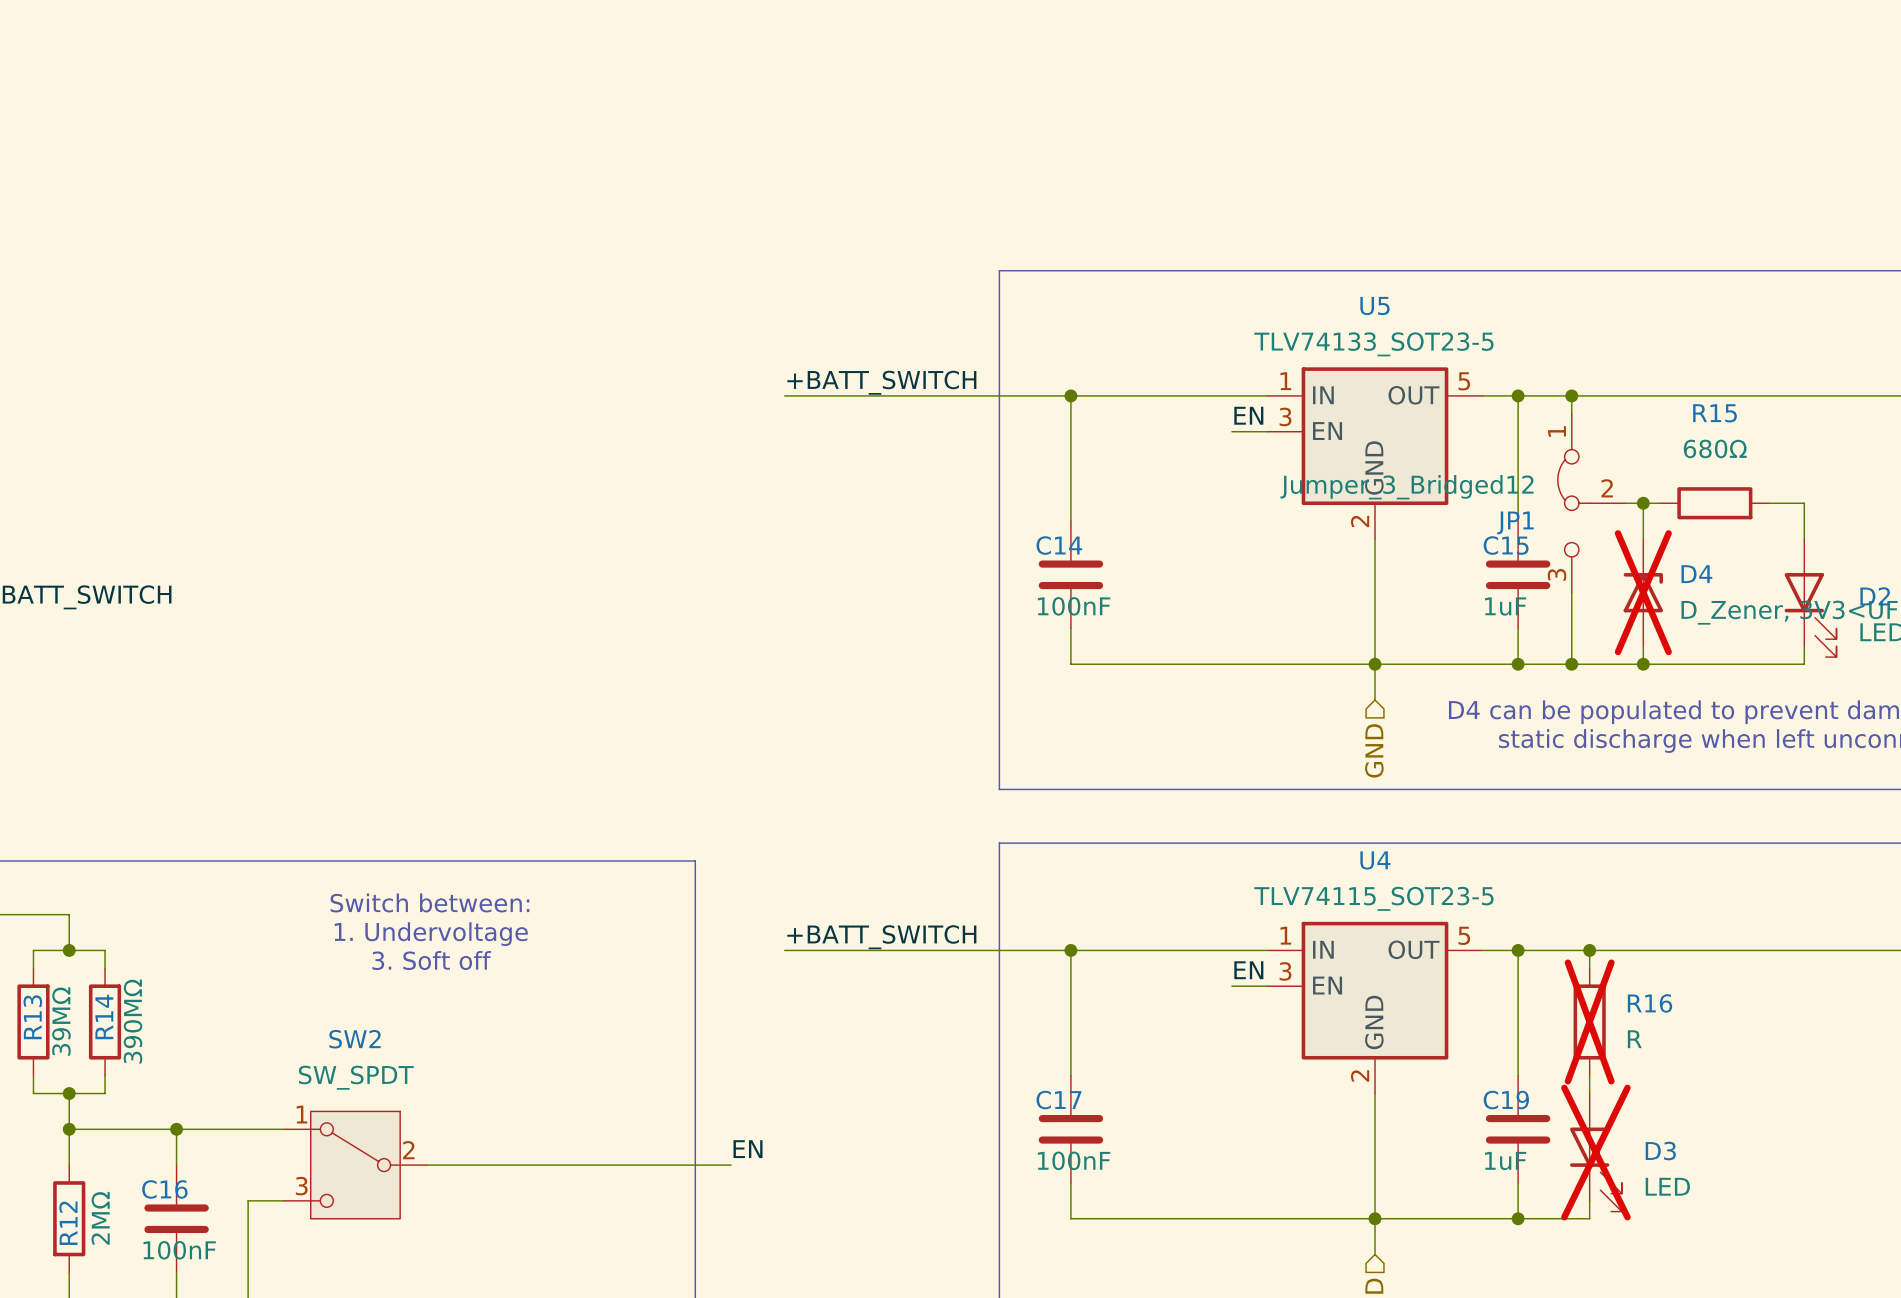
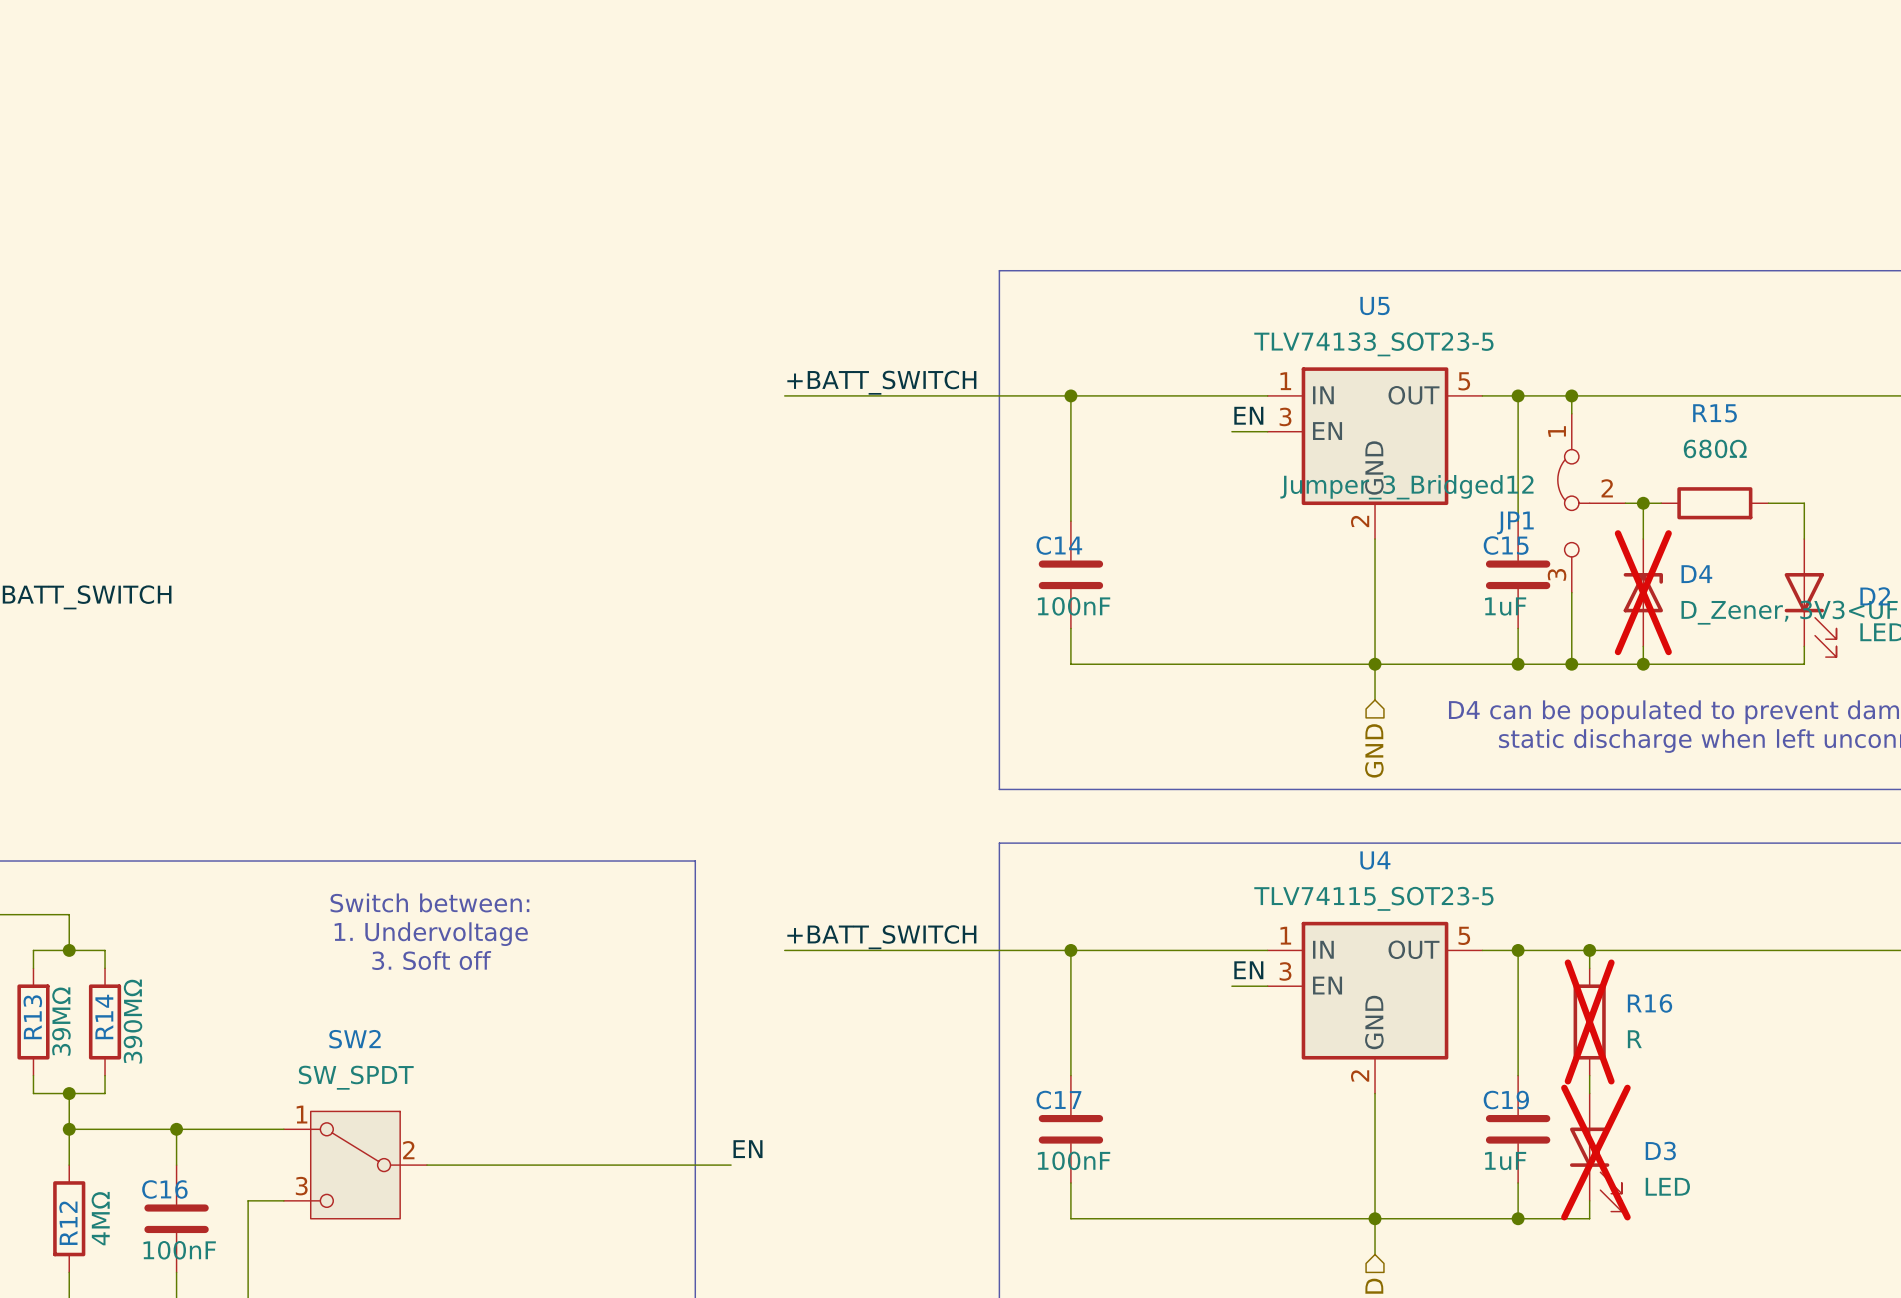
R12 value: 2MΩ (100, 1218) -> 4MΩ (100, 1218)

